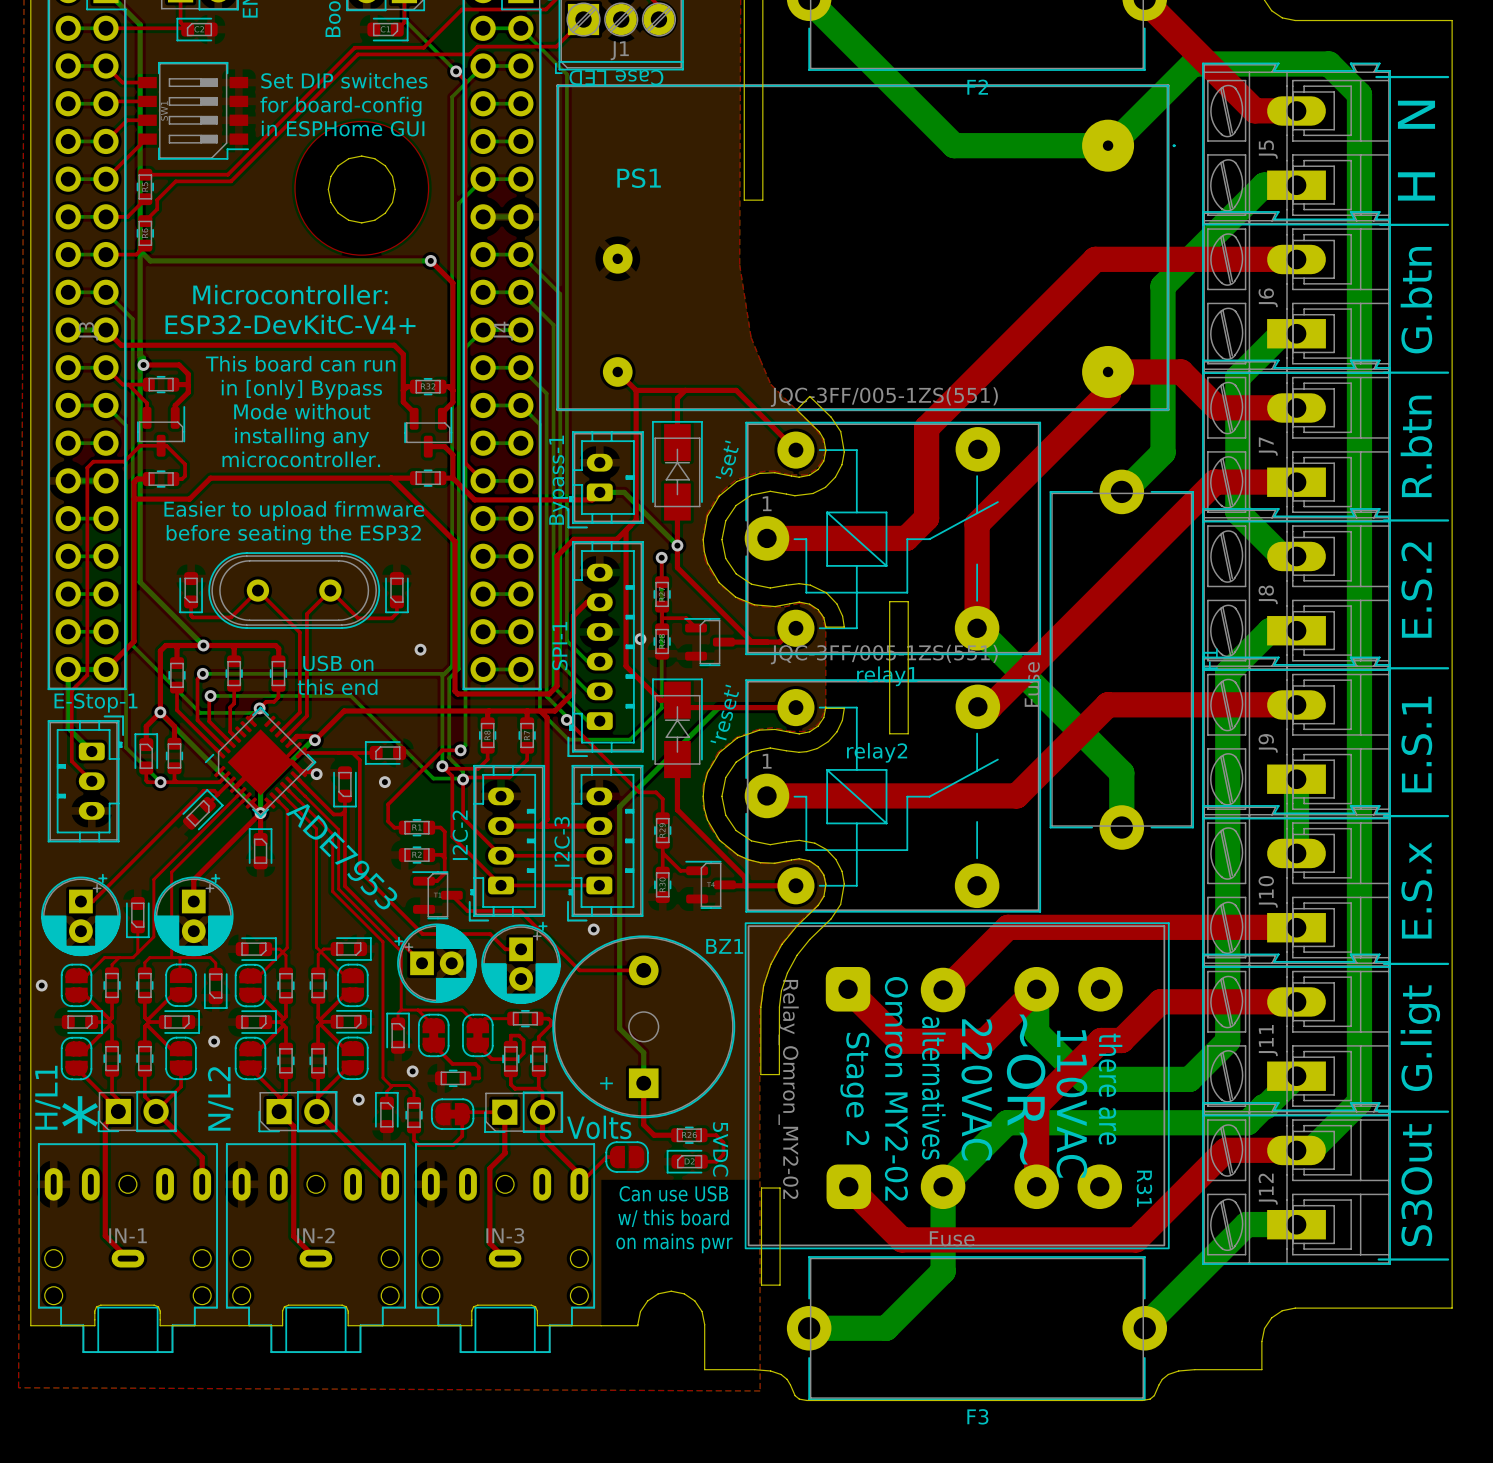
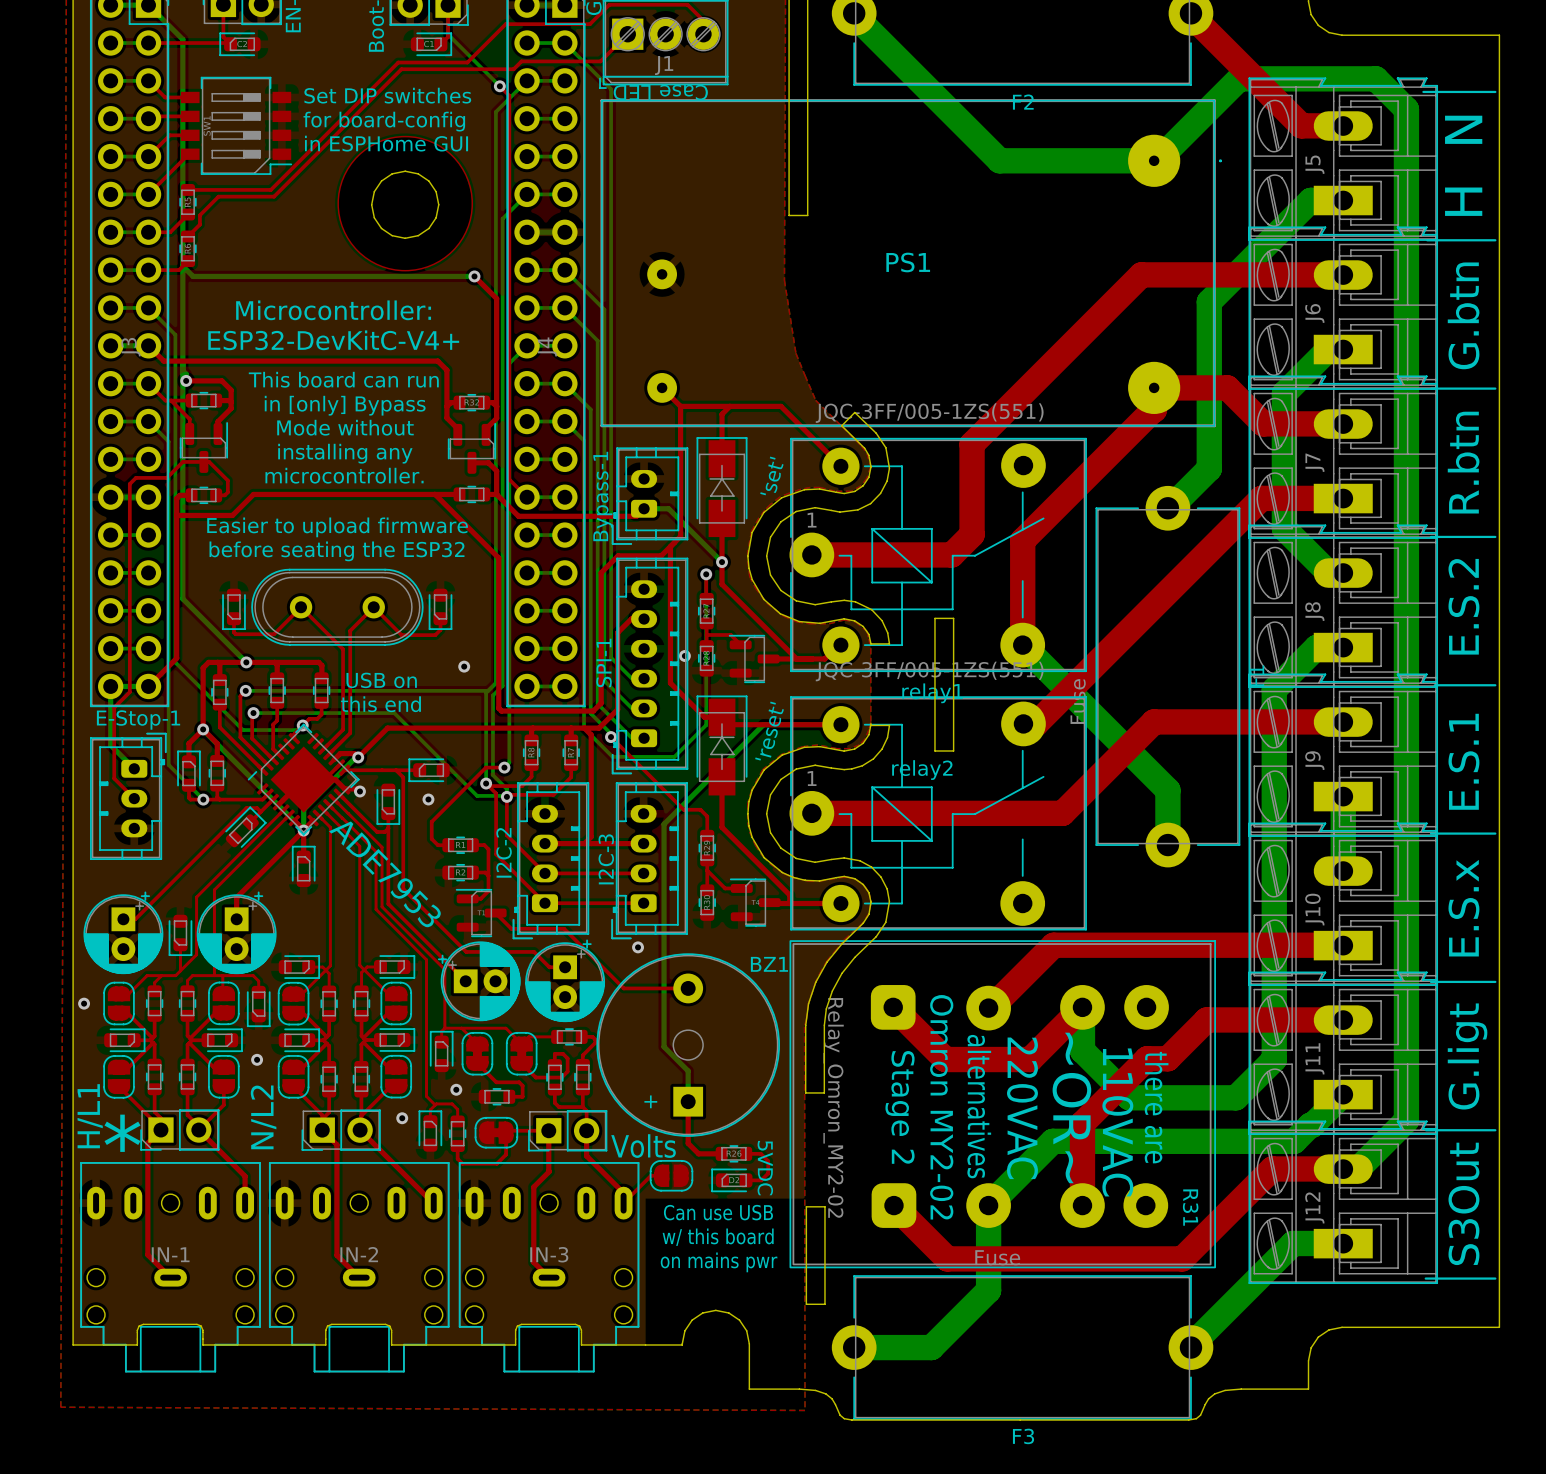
PS1 name position: PS1 (639, 178) -> PS1 (908, 262)

